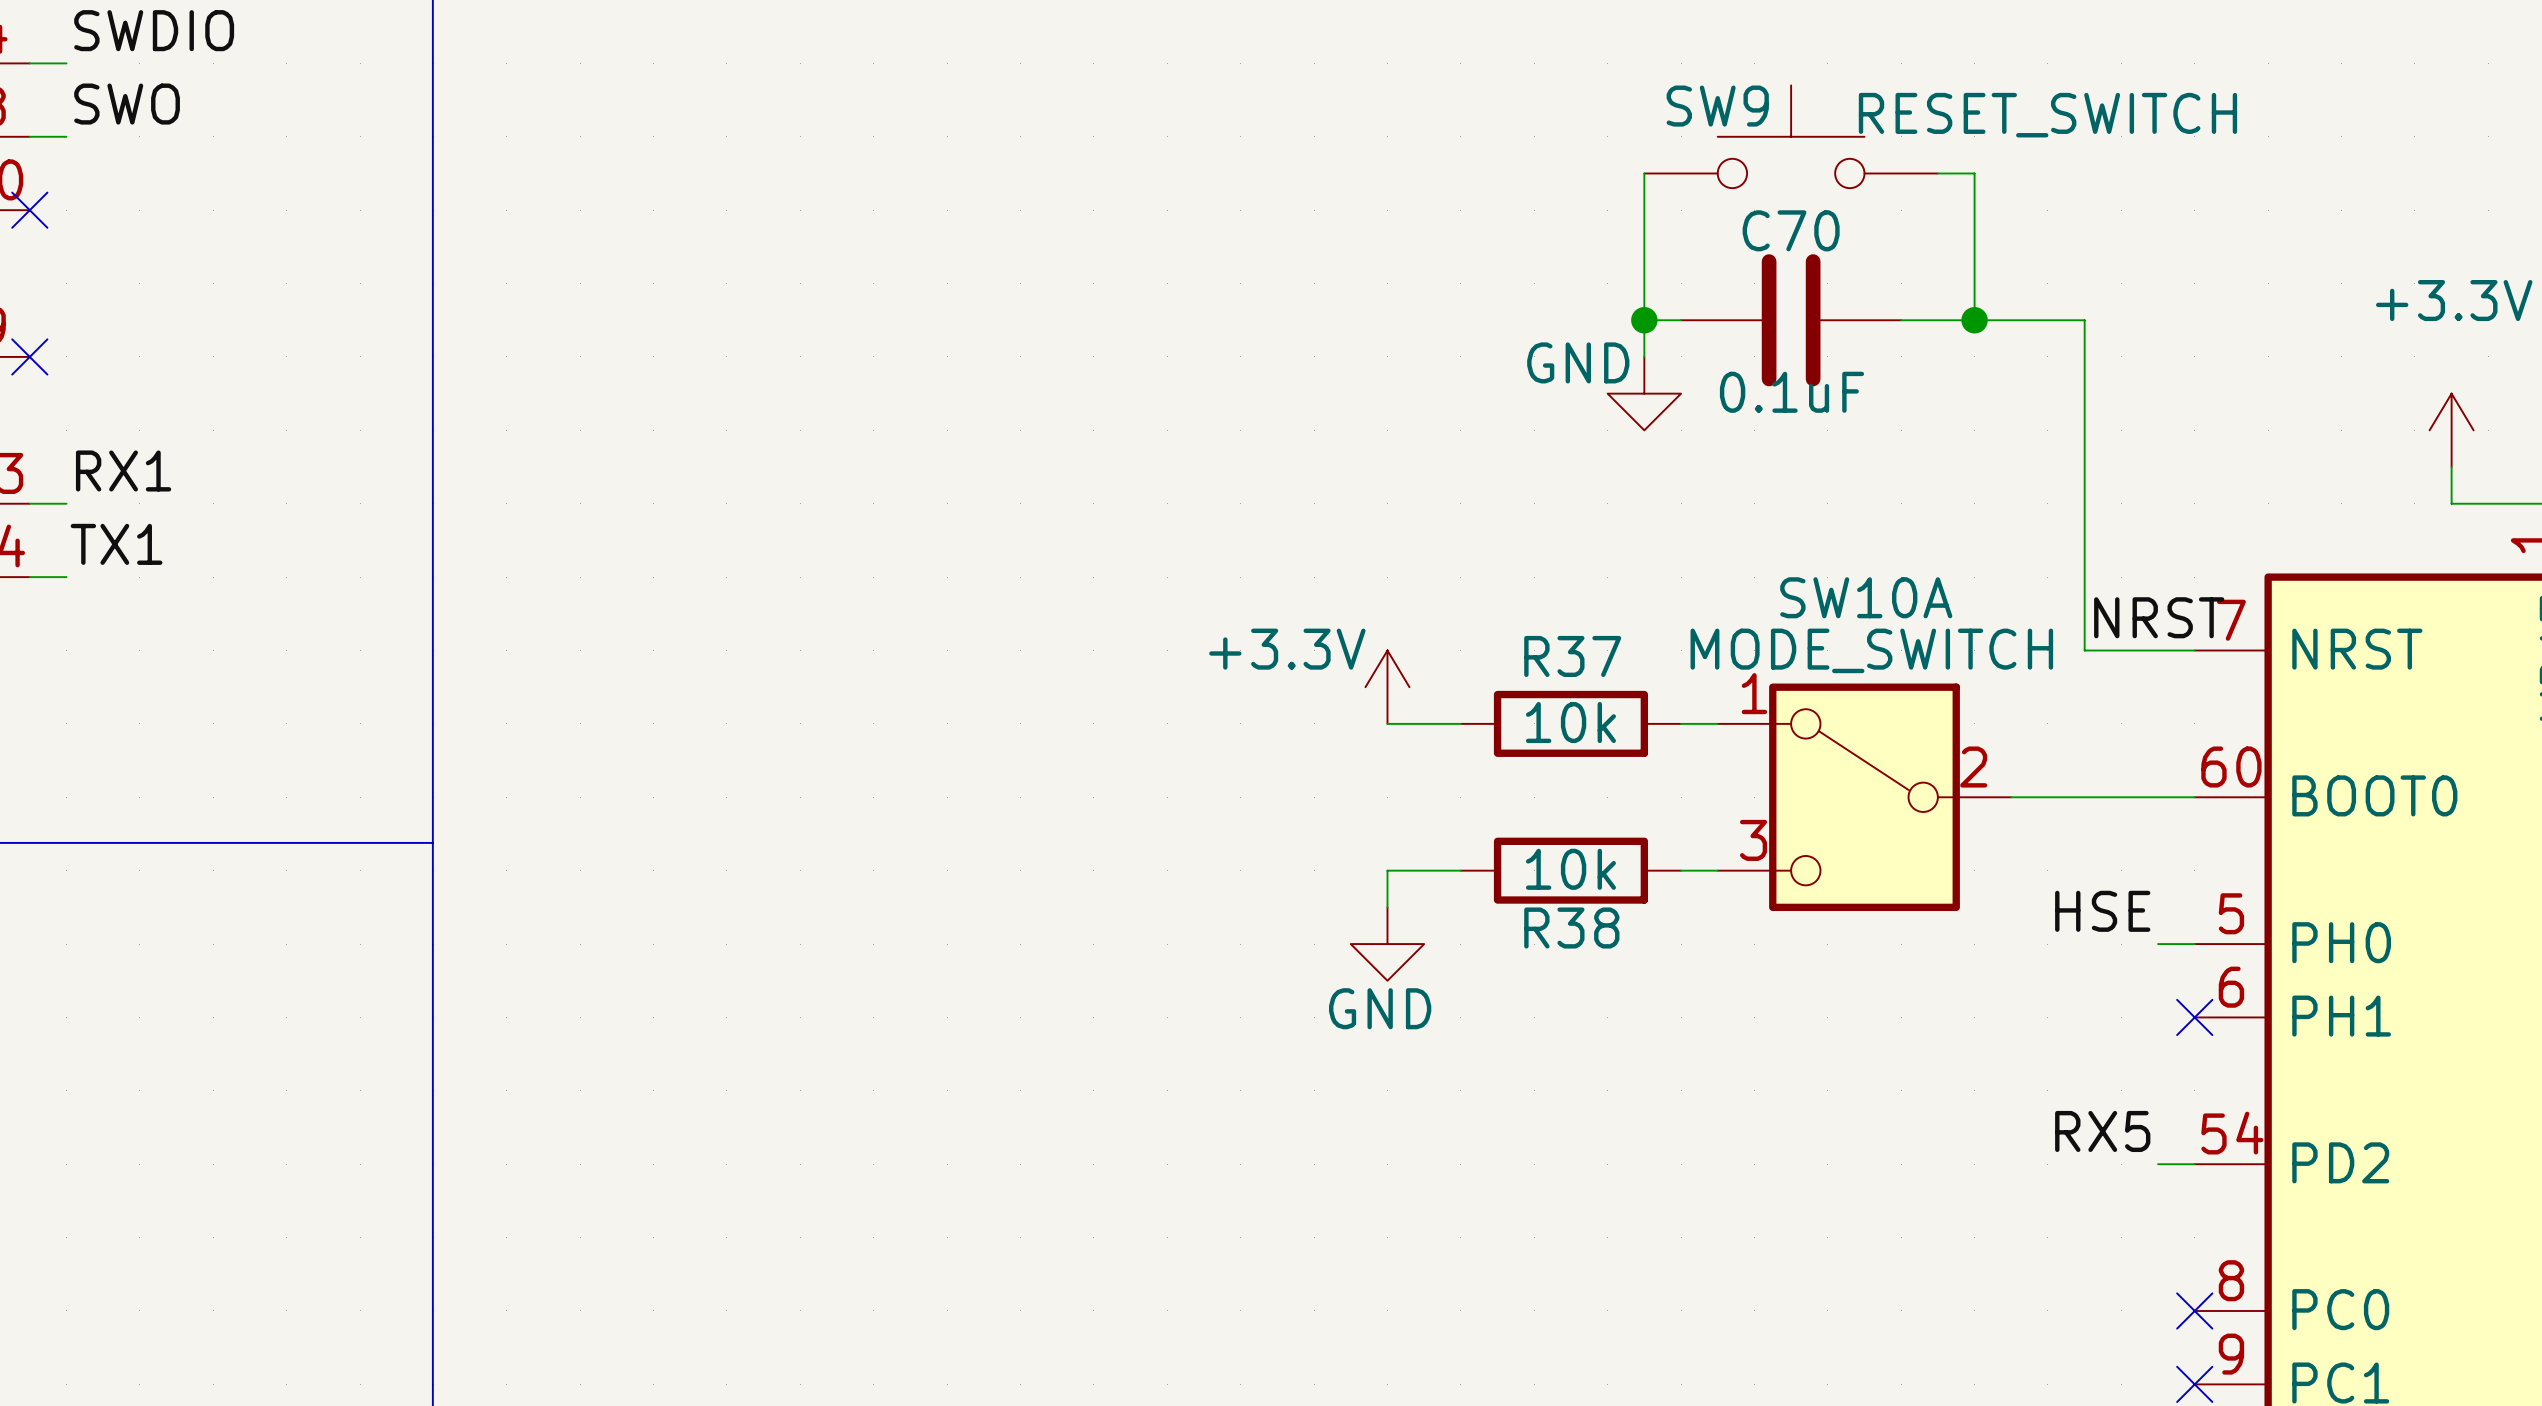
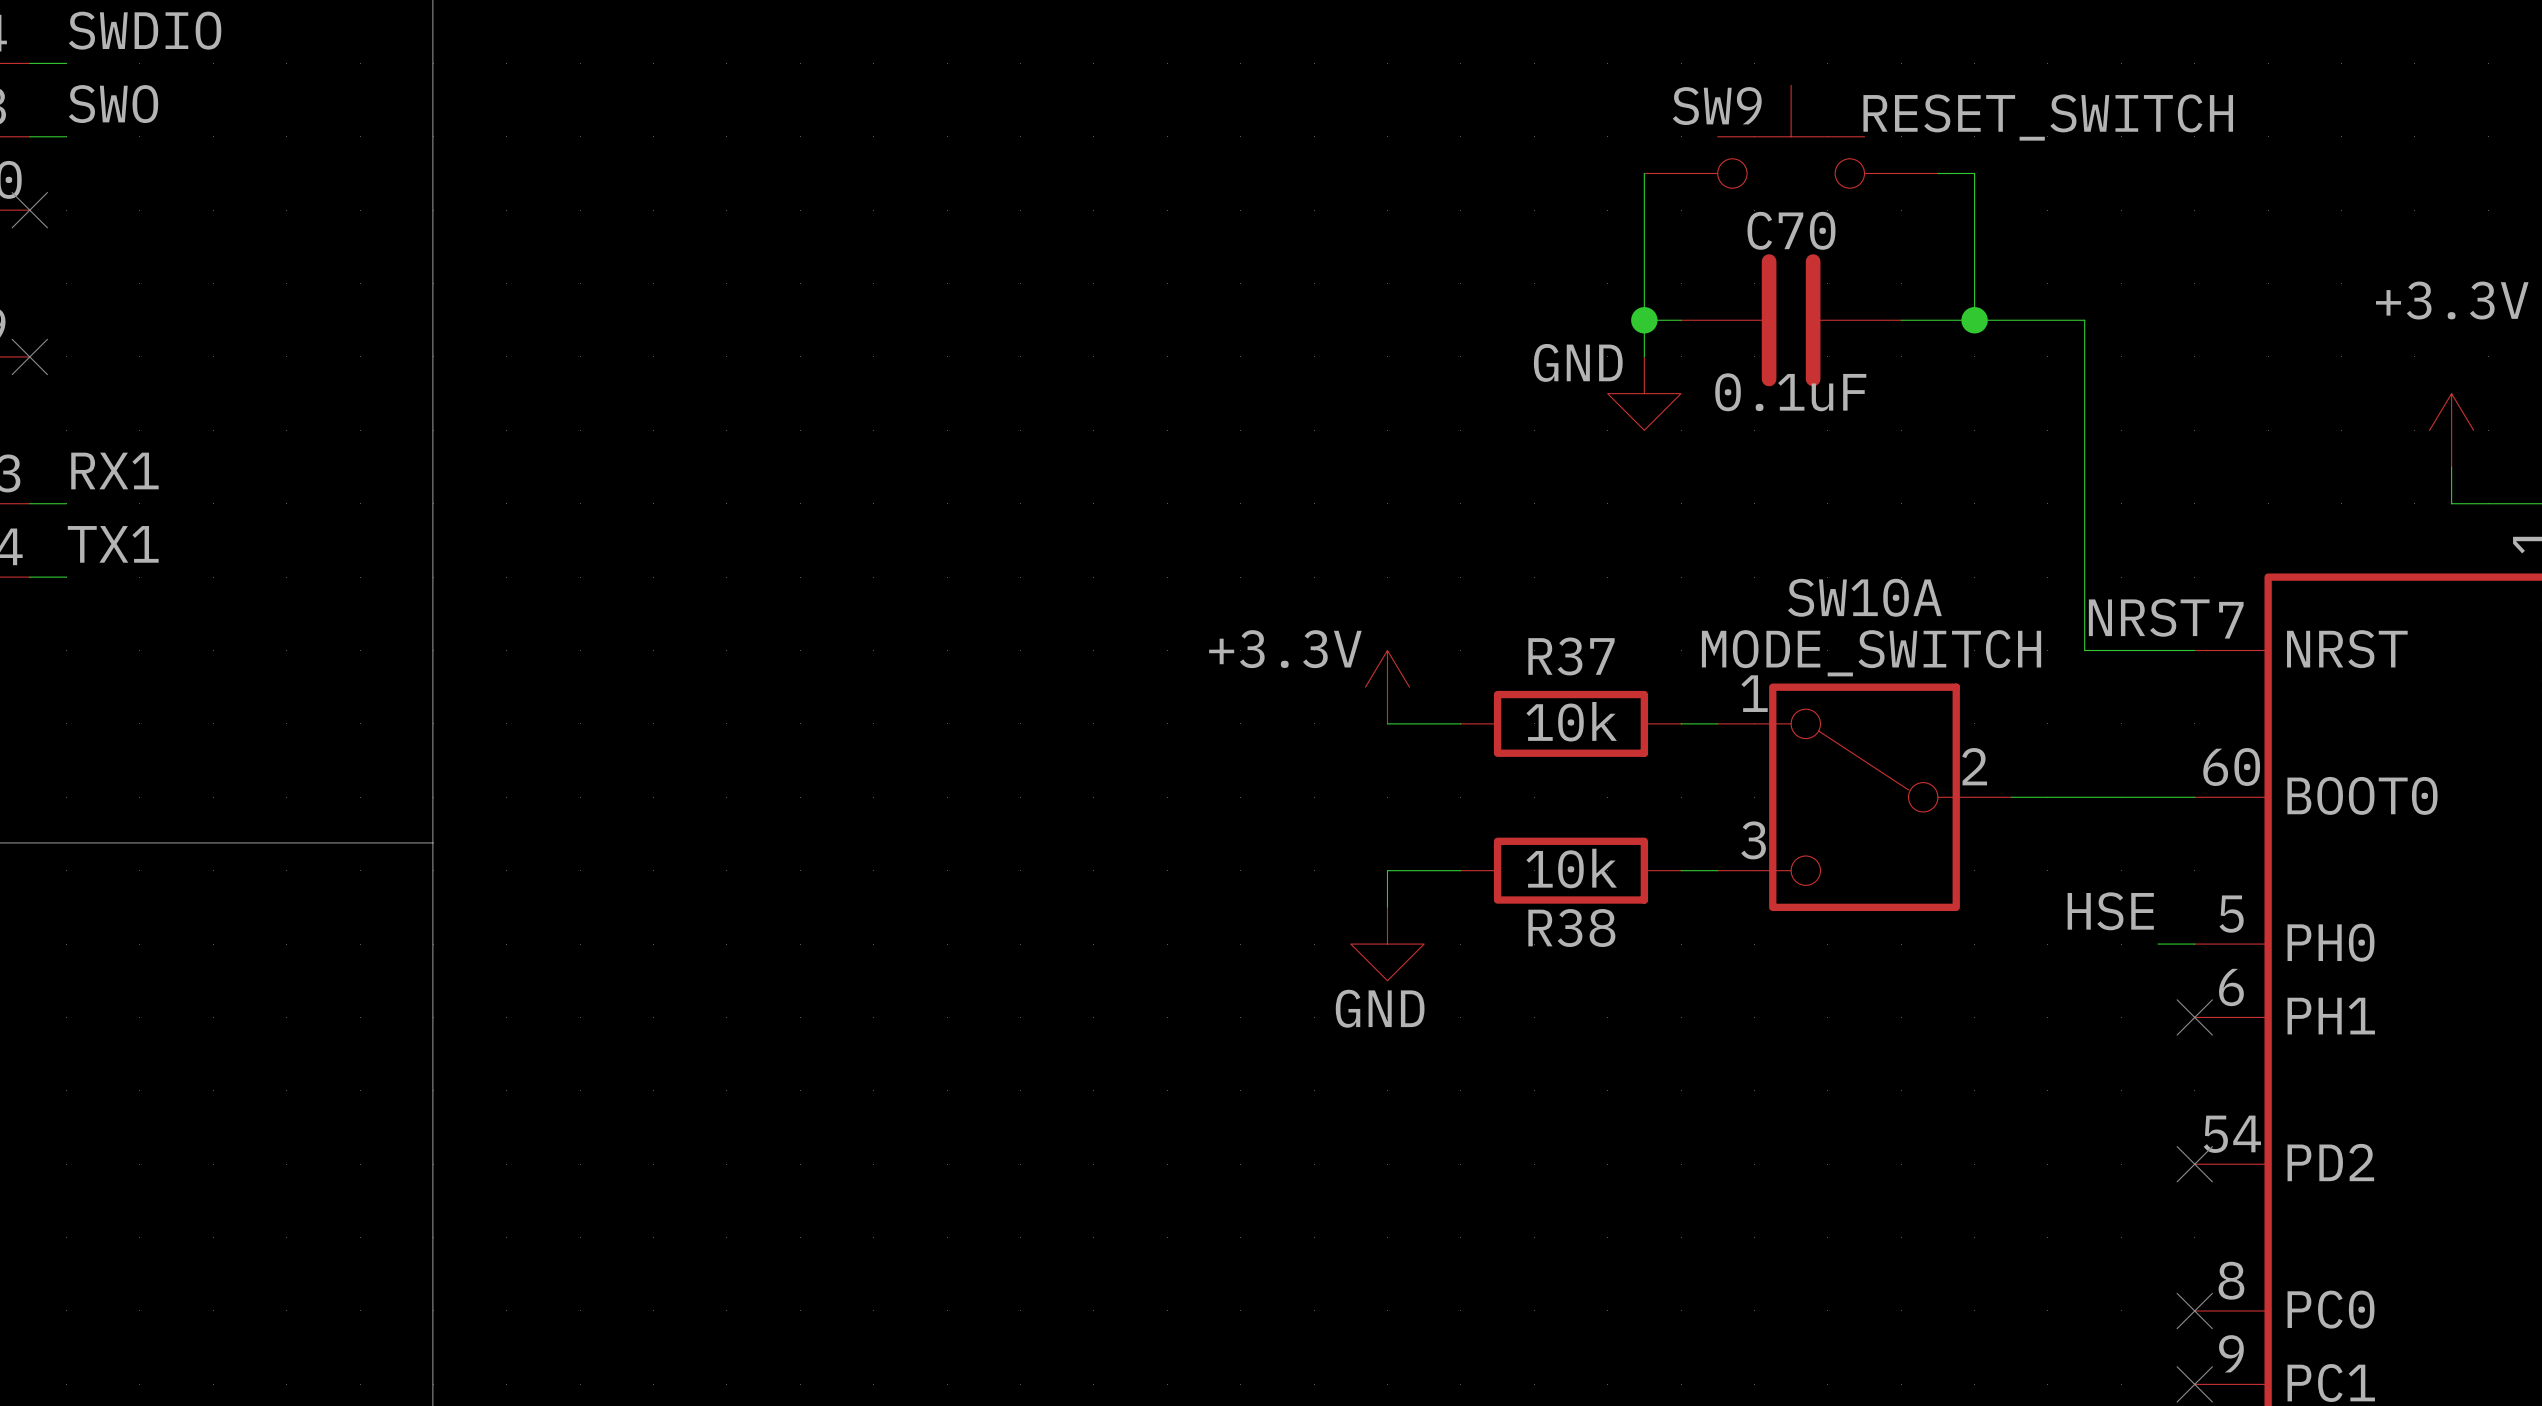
label: RX5 (2102, 1131) -> none
wire: (2158, 1164) (2194, 1164) -> none
no-connect mark: none -> (2194, 1164)

